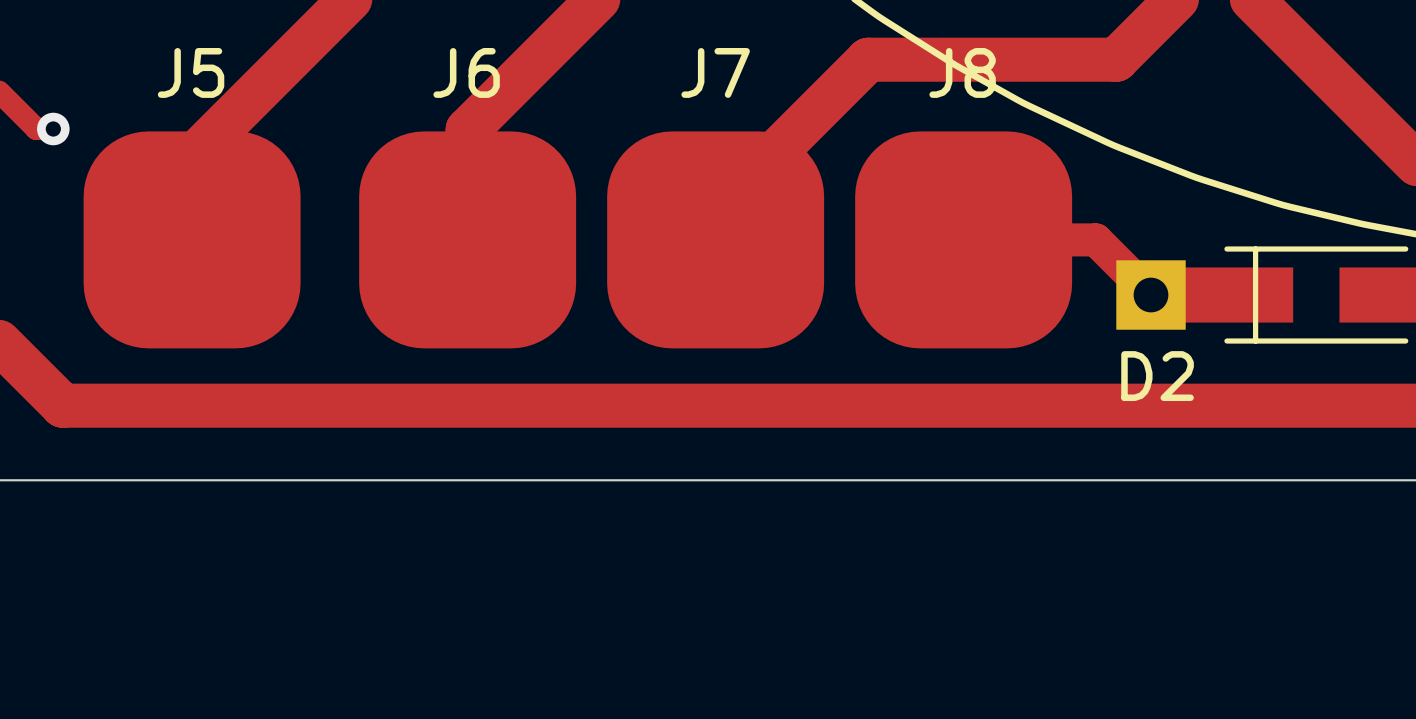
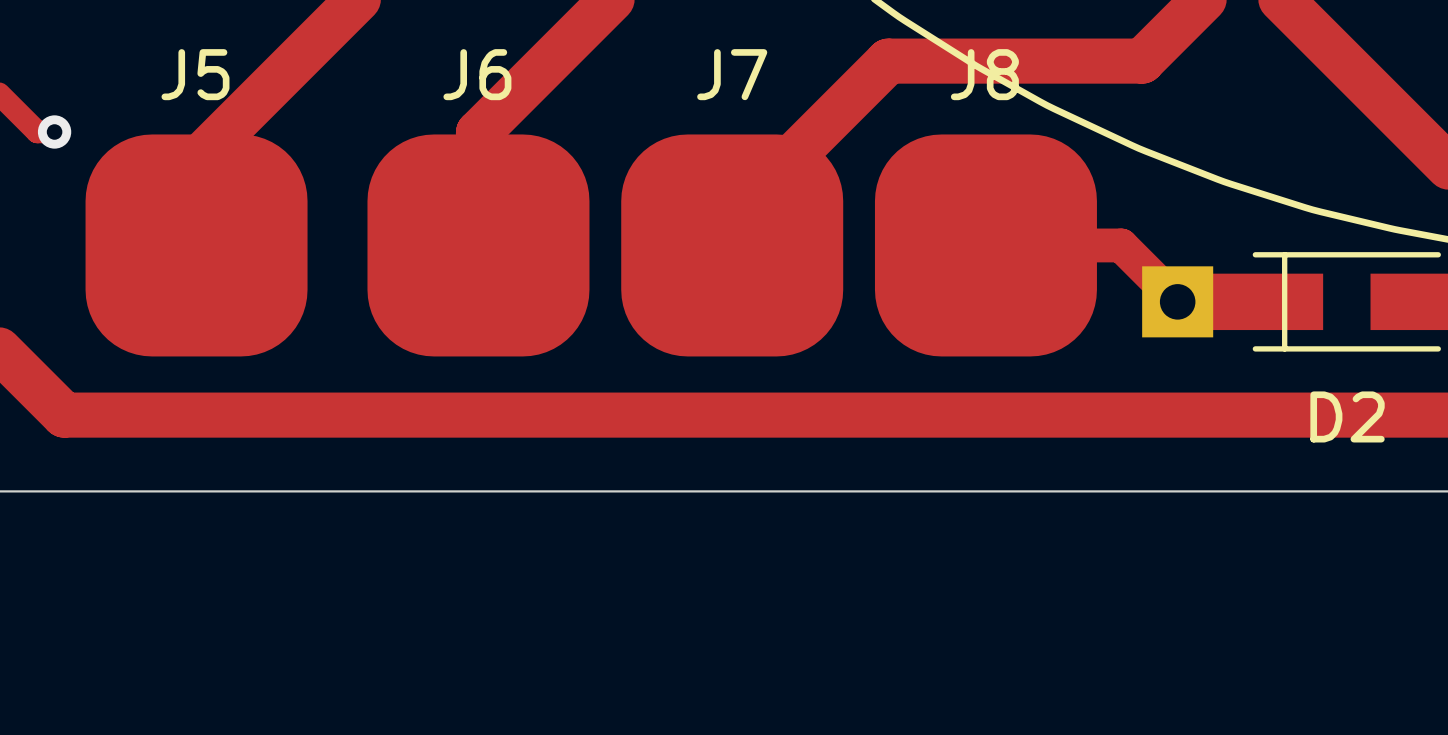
D2 name position: D2 (1157, 376) -> D2 (1347, 416)

